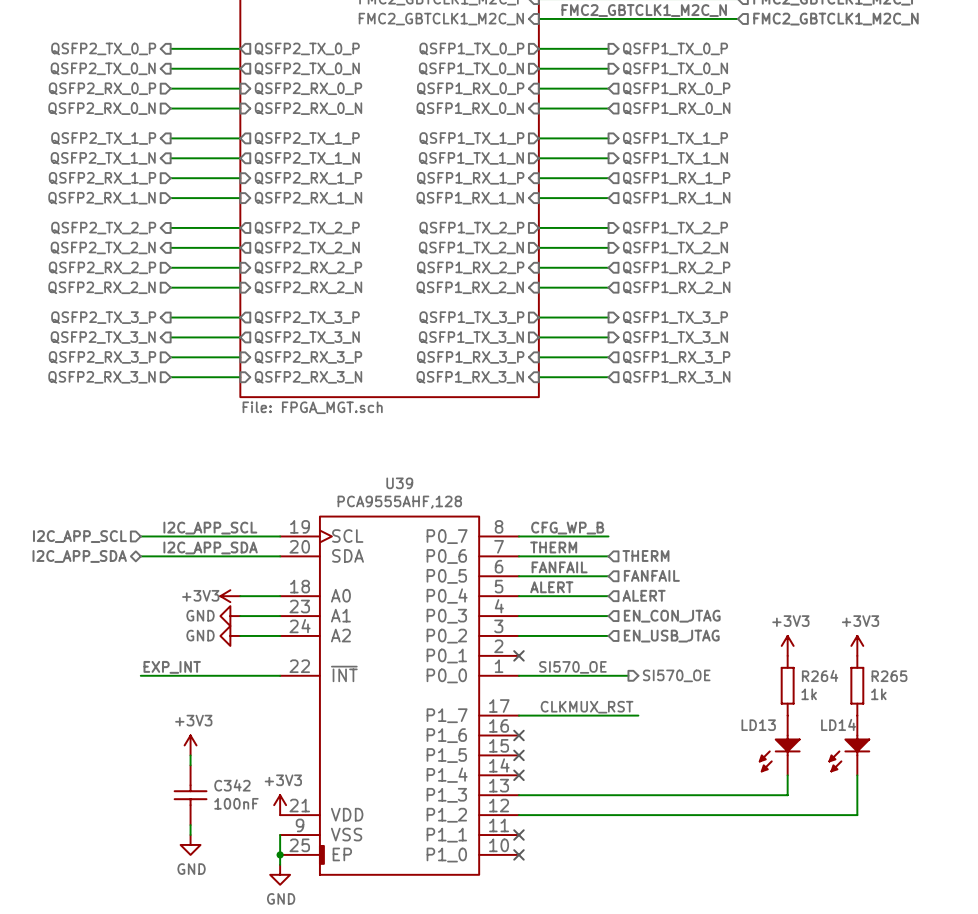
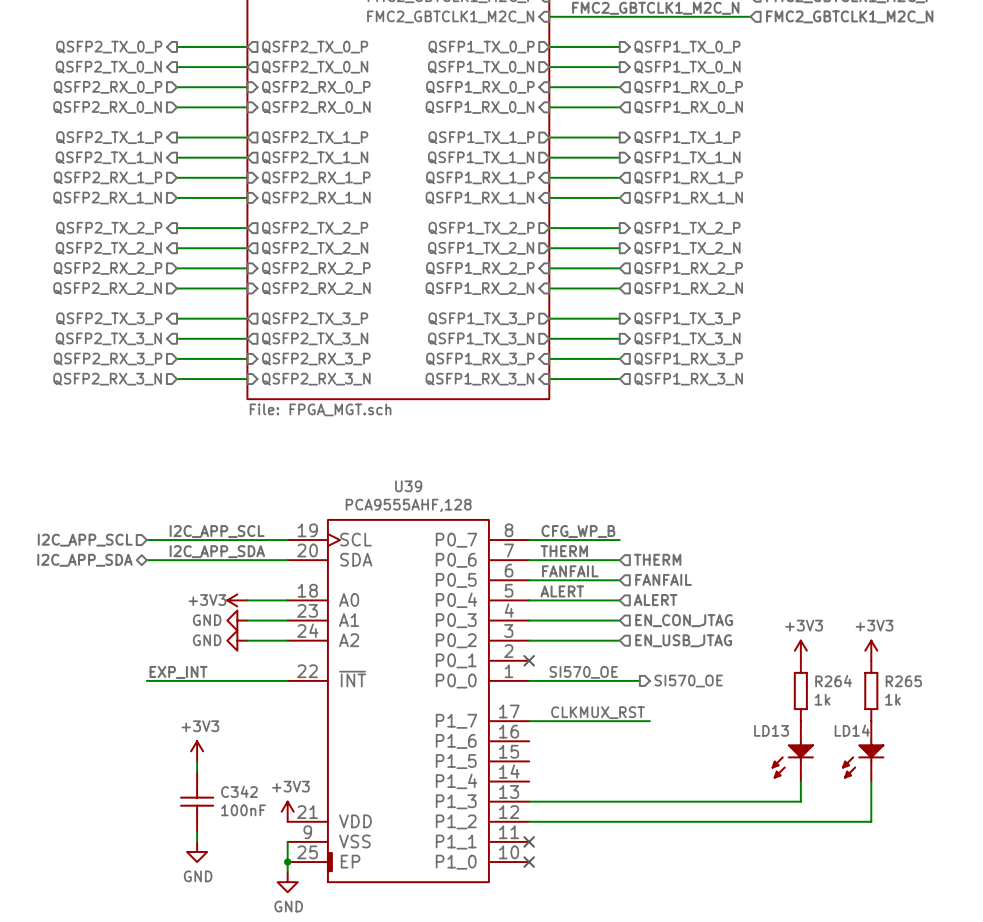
no-connect mark: (518, 735) -> none
no-connect mark: (518, 755) -> none
no-connect mark: (518, 775) -> none

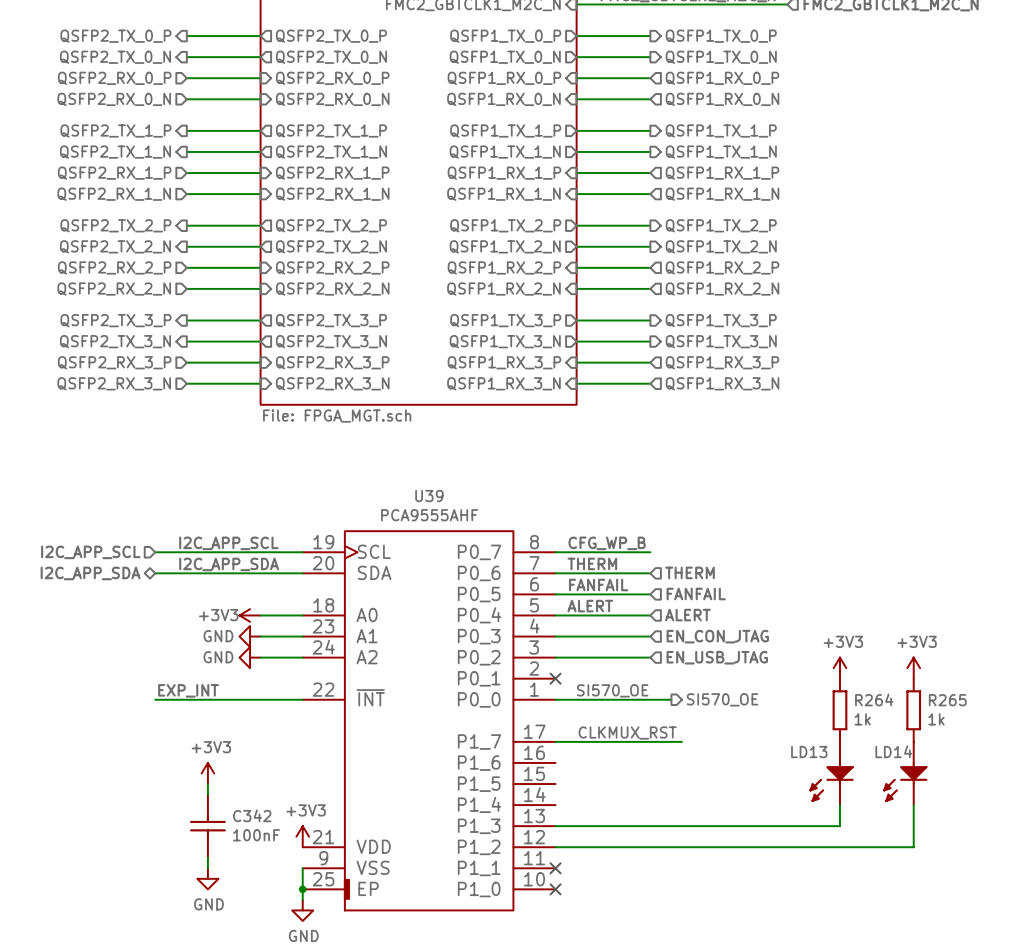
U39 value: PCA9555AHF,128 (408, 505) -> PCA9555AHF (429, 515)

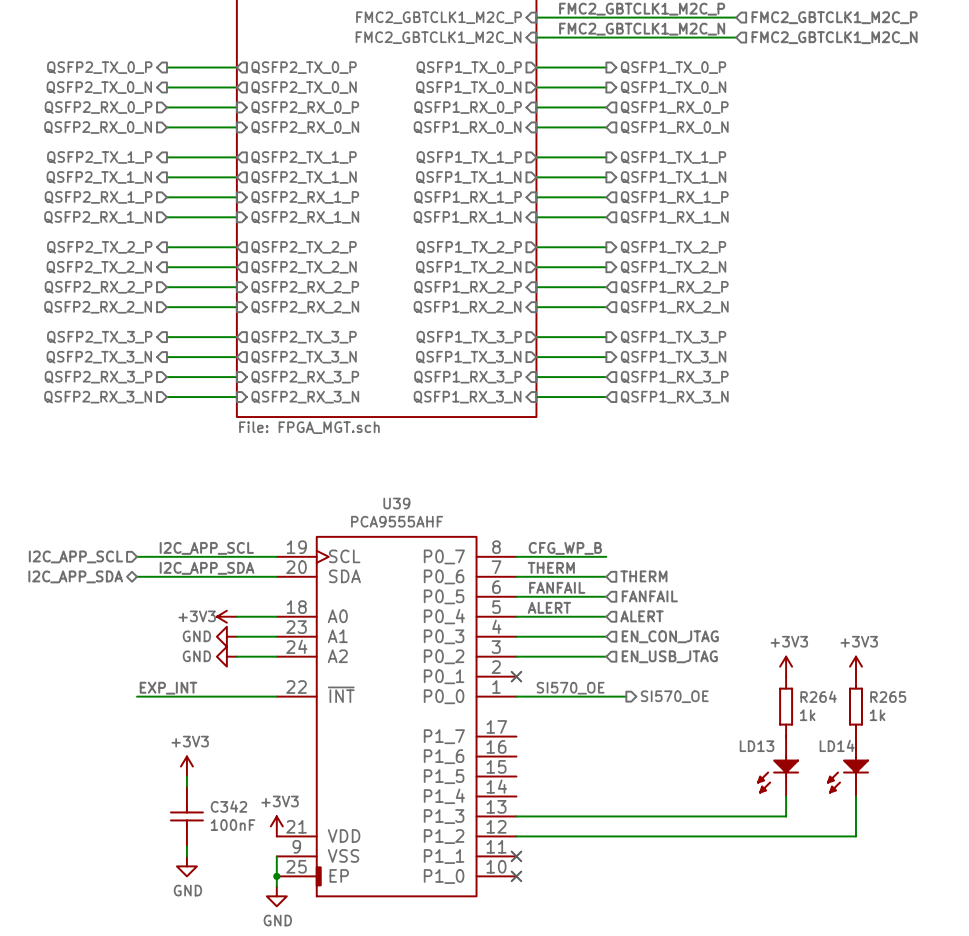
label: CLKMUX_RST (627, 732) -> none
wire: (555, 741) (681, 741) -> none

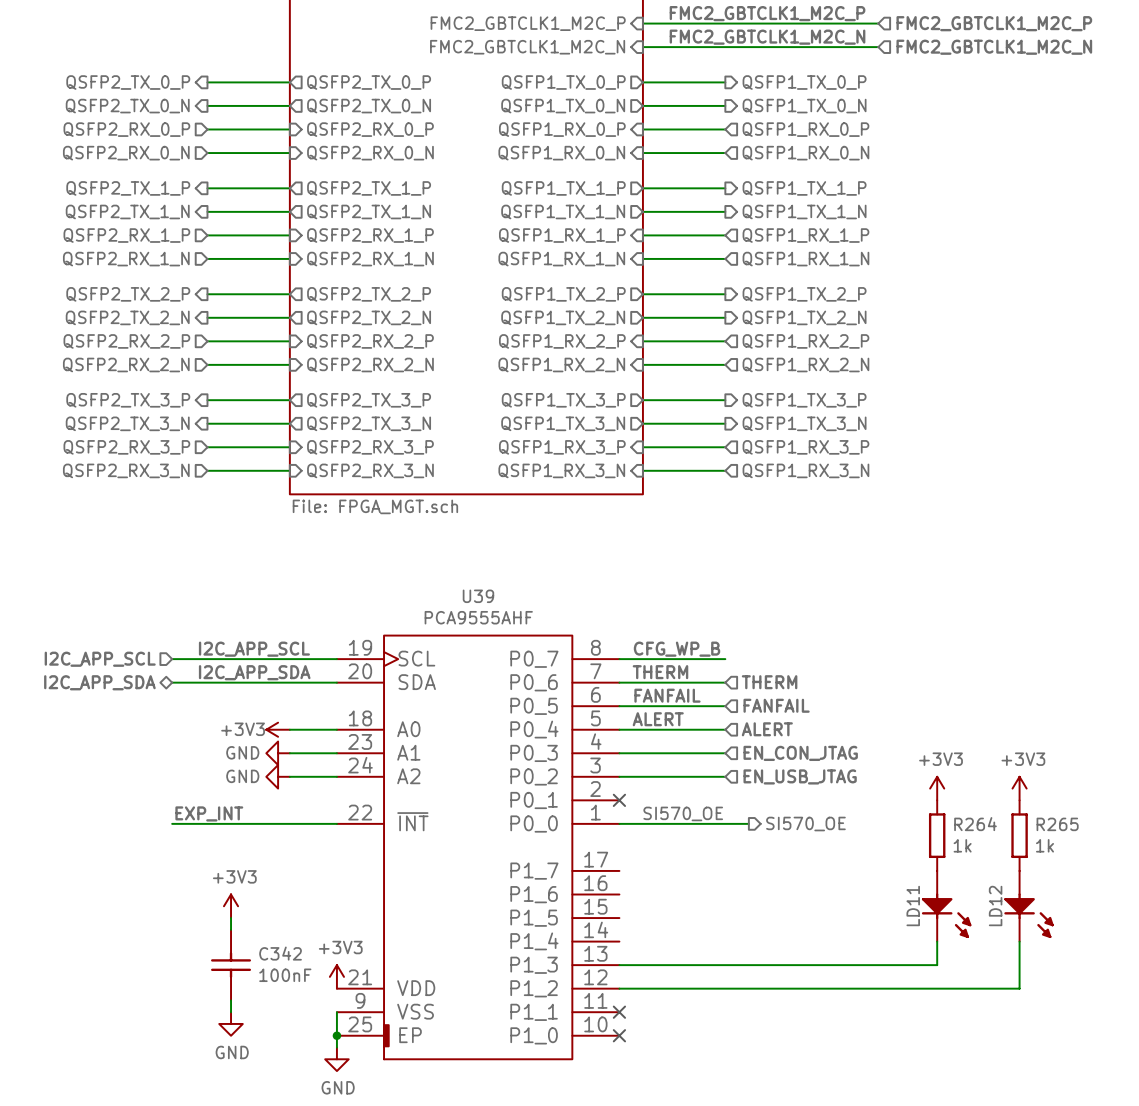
LD13: (778, 766) -> none
LD11: none -> (946, 906)
LD14: (848, 766) -> none
LD12: none -> (1028, 906)

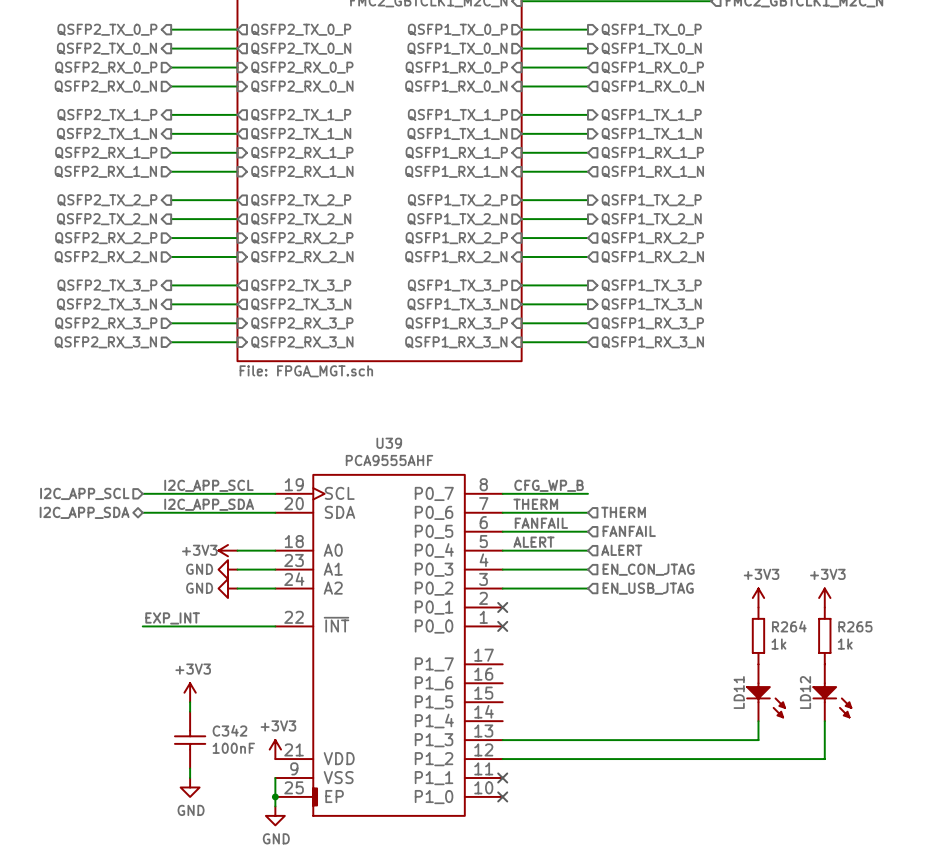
label: SI570_OE (683, 813) -> none
wire: (619, 823) (748, 823) -> none
no-connect mark: none -> (502, 626)
hierarchical label: SI570_OE (805, 824) -> none

